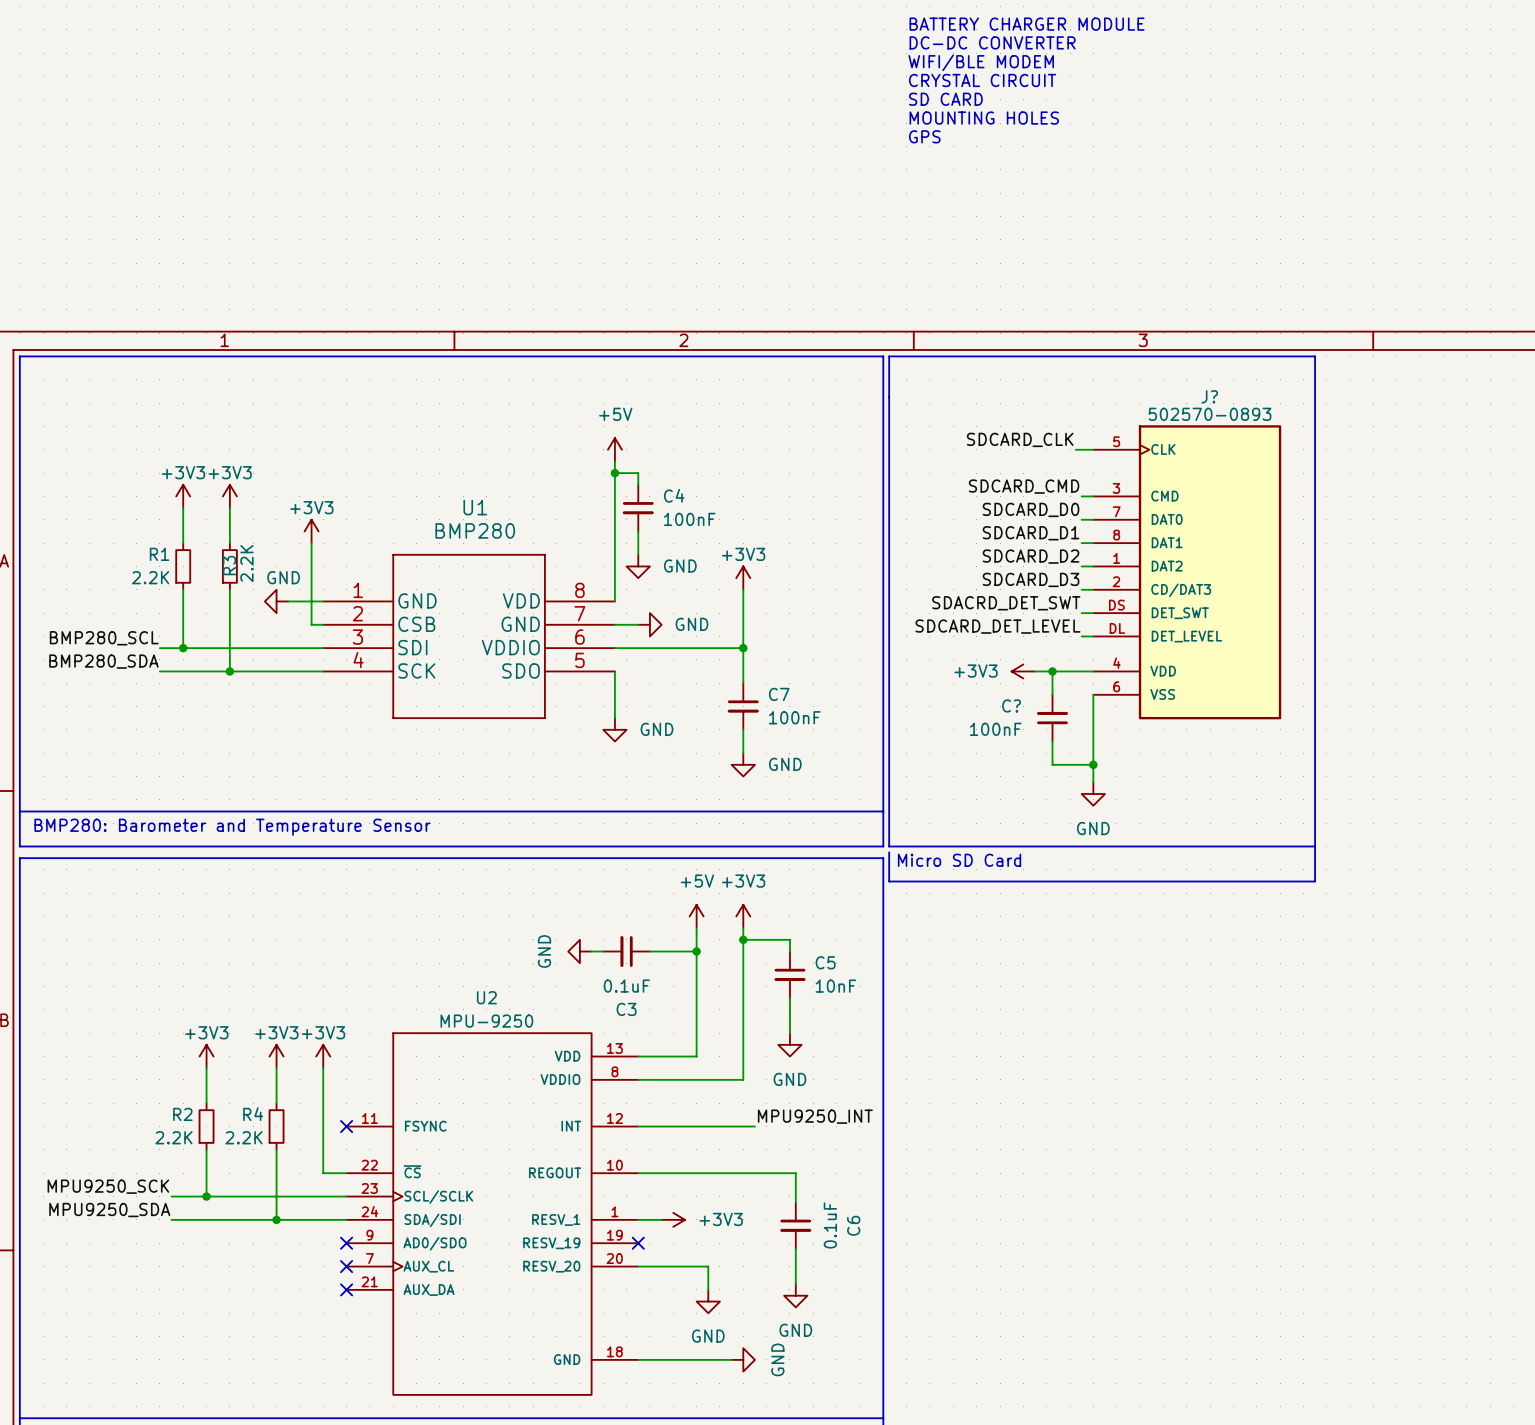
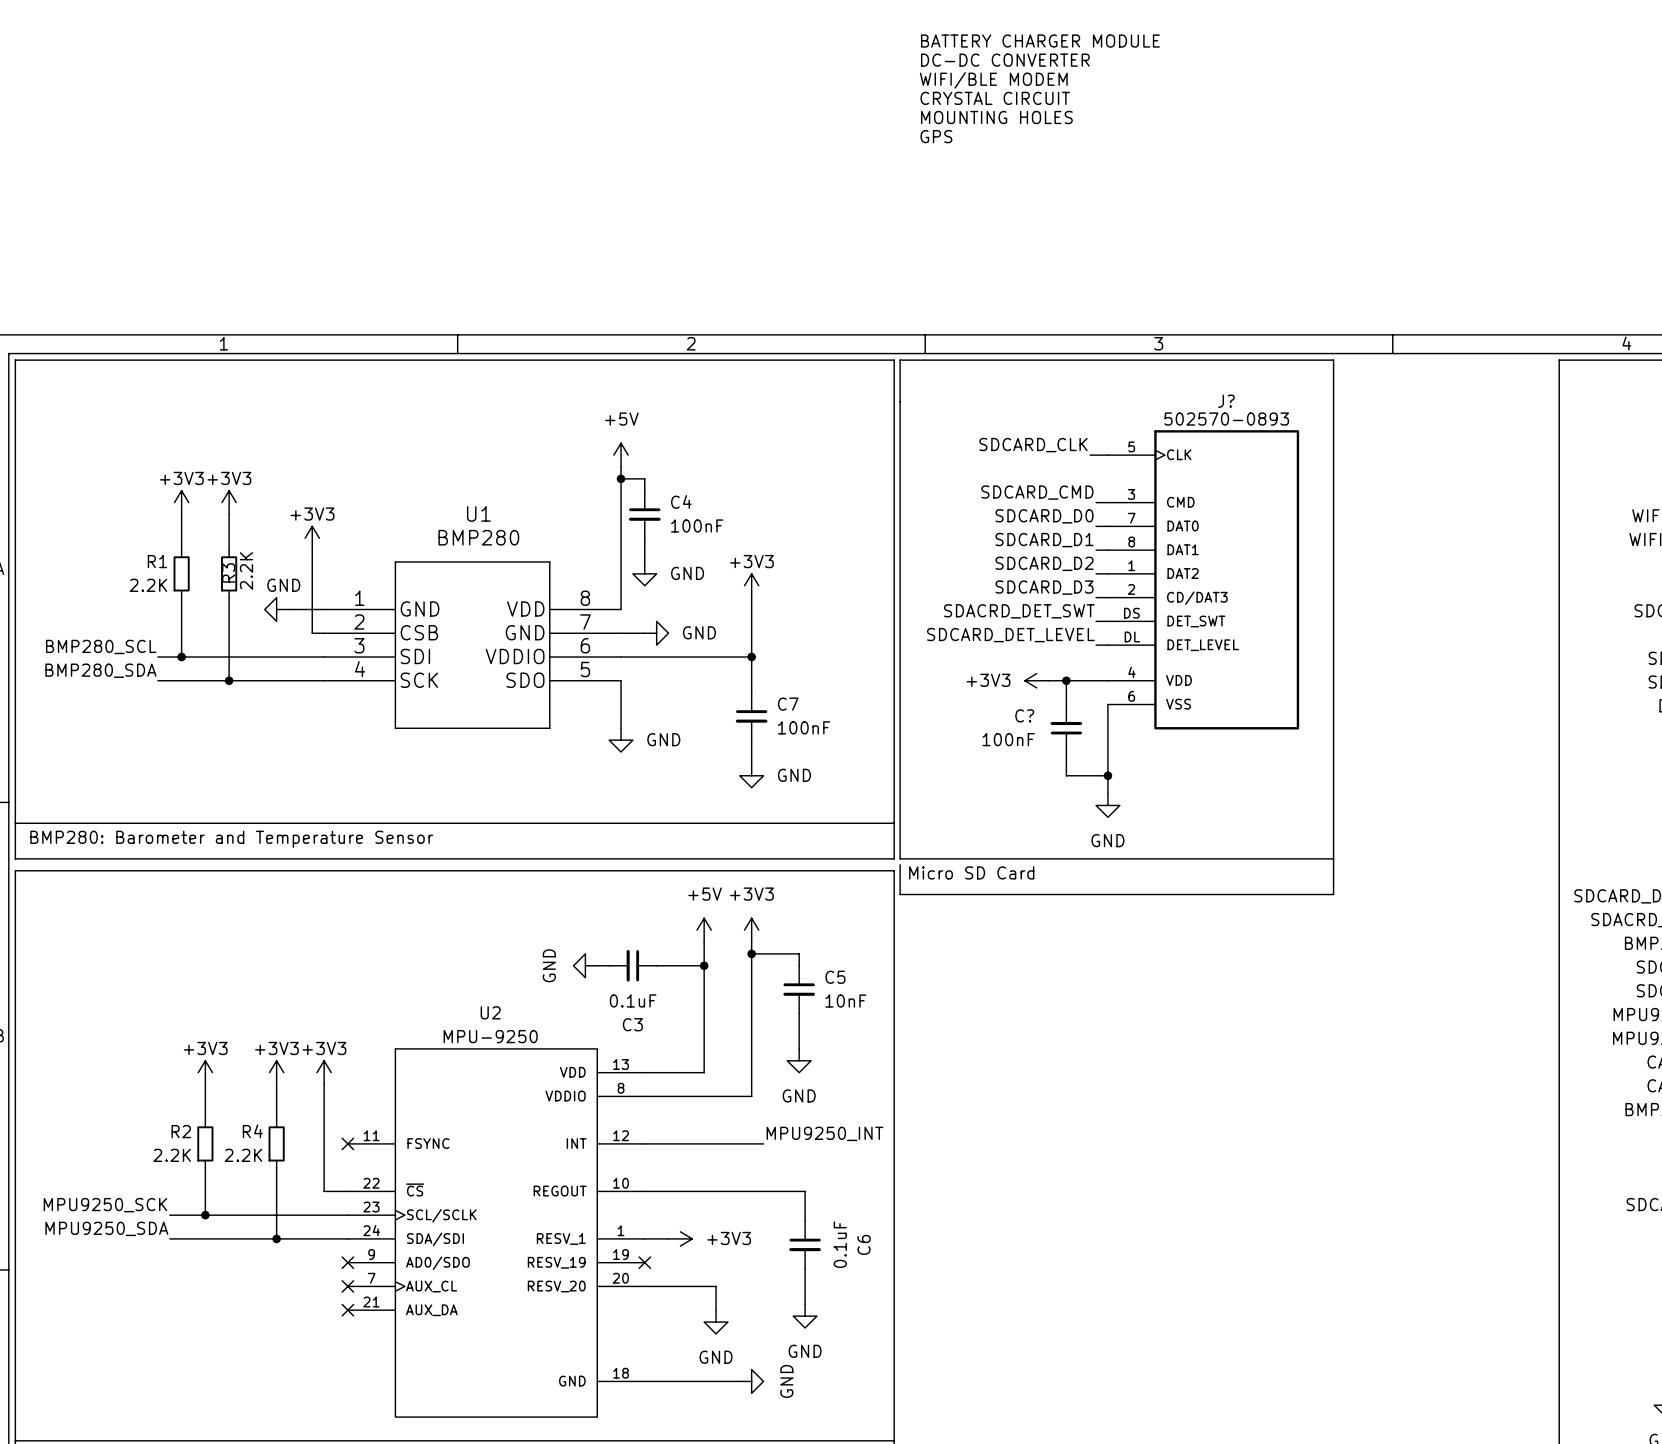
text: BATTERY CHARGER MODULE (1027, 24) -> none
text: DC-DC CONVERTER (992, 42) -> BATTERY CHARGER MODULE (1040, 41)
text: WIFI/BLE MODEM (981, 62) -> DC-DC CONVERTER (1005, 60)
text: CRYSTAL CIRCUIT (982, 80) -> WIFI/BLE MODEM (993, 80)
text: SD CARD (945, 99) -> CRYSTAL CIRCUIT (995, 98)

